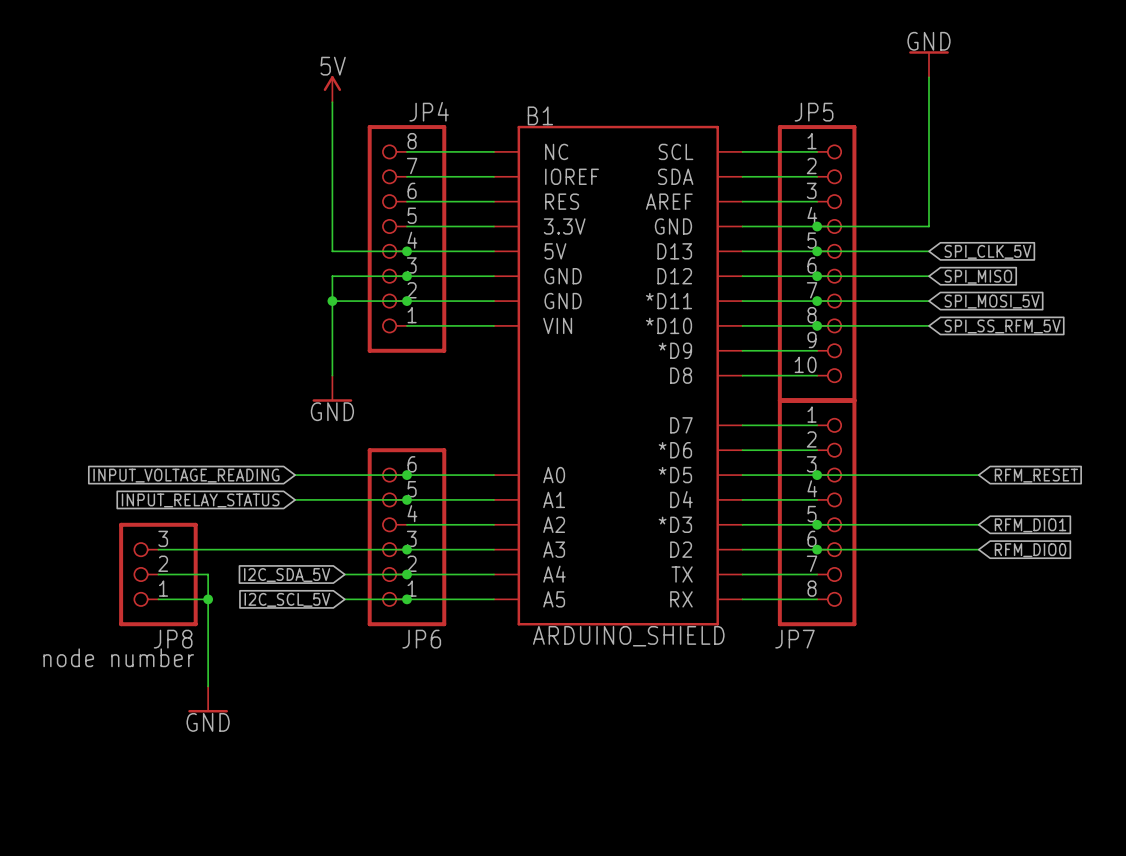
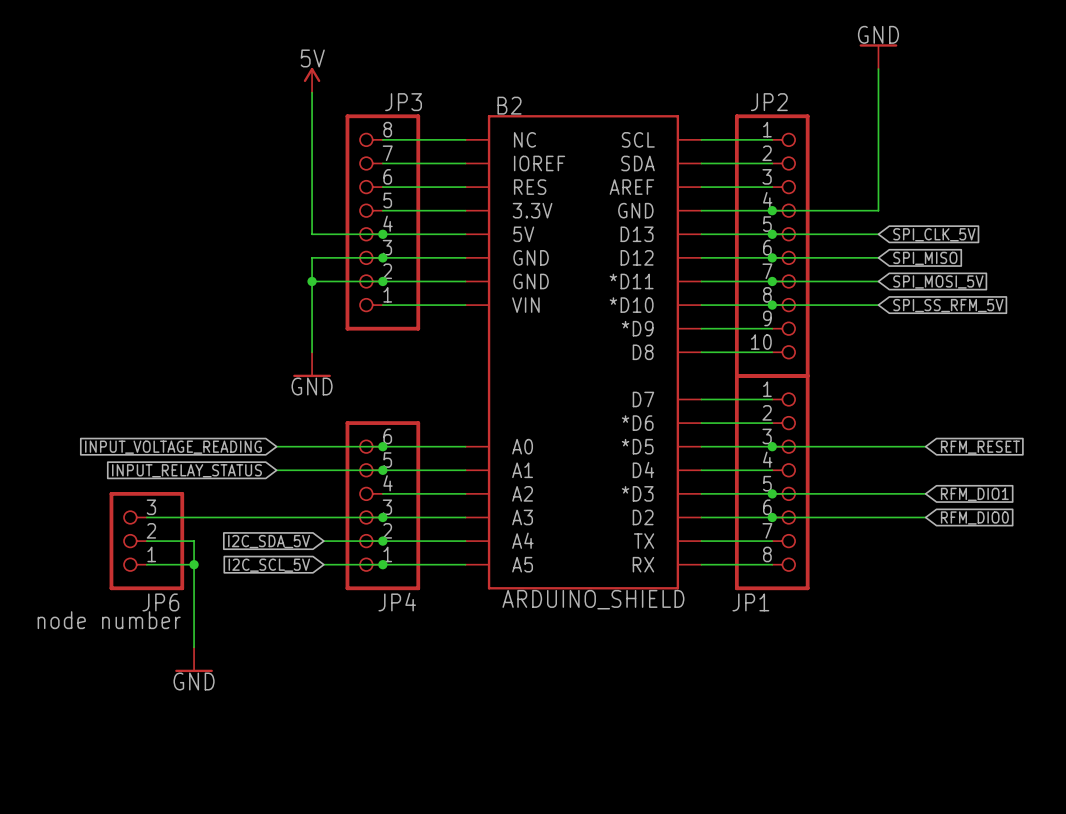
JP4 name: JP4 (429, 111) -> JP3 (403, 102)
JP5 name: JP5 (814, 112) -> JP2 (769, 102)
B1 name: B1 (540, 115) -> B2 (509, 105)
JP8 name: JP8 (173, 639) -> JP6 (160, 602)
JP6 name: JP6 (421, 639) -> JP4 (397, 602)
JP7 name: JP7 (794, 639) -> JP1 (750, 602)

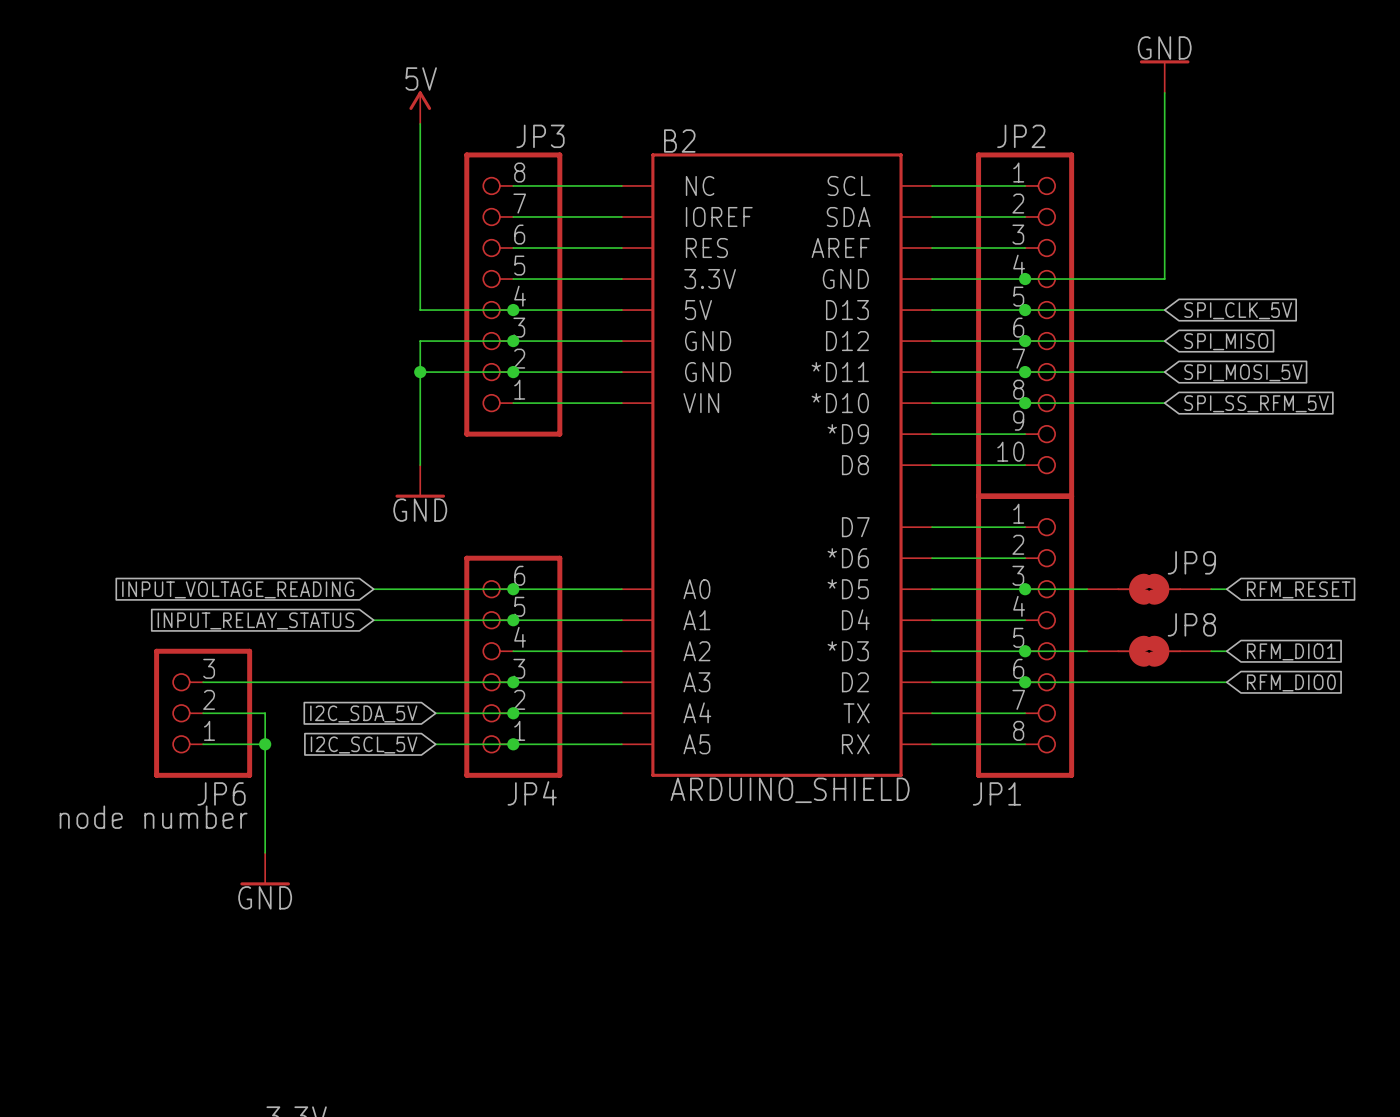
JP9: none -> (1149, 589)
JP8: none -> (1149, 651)

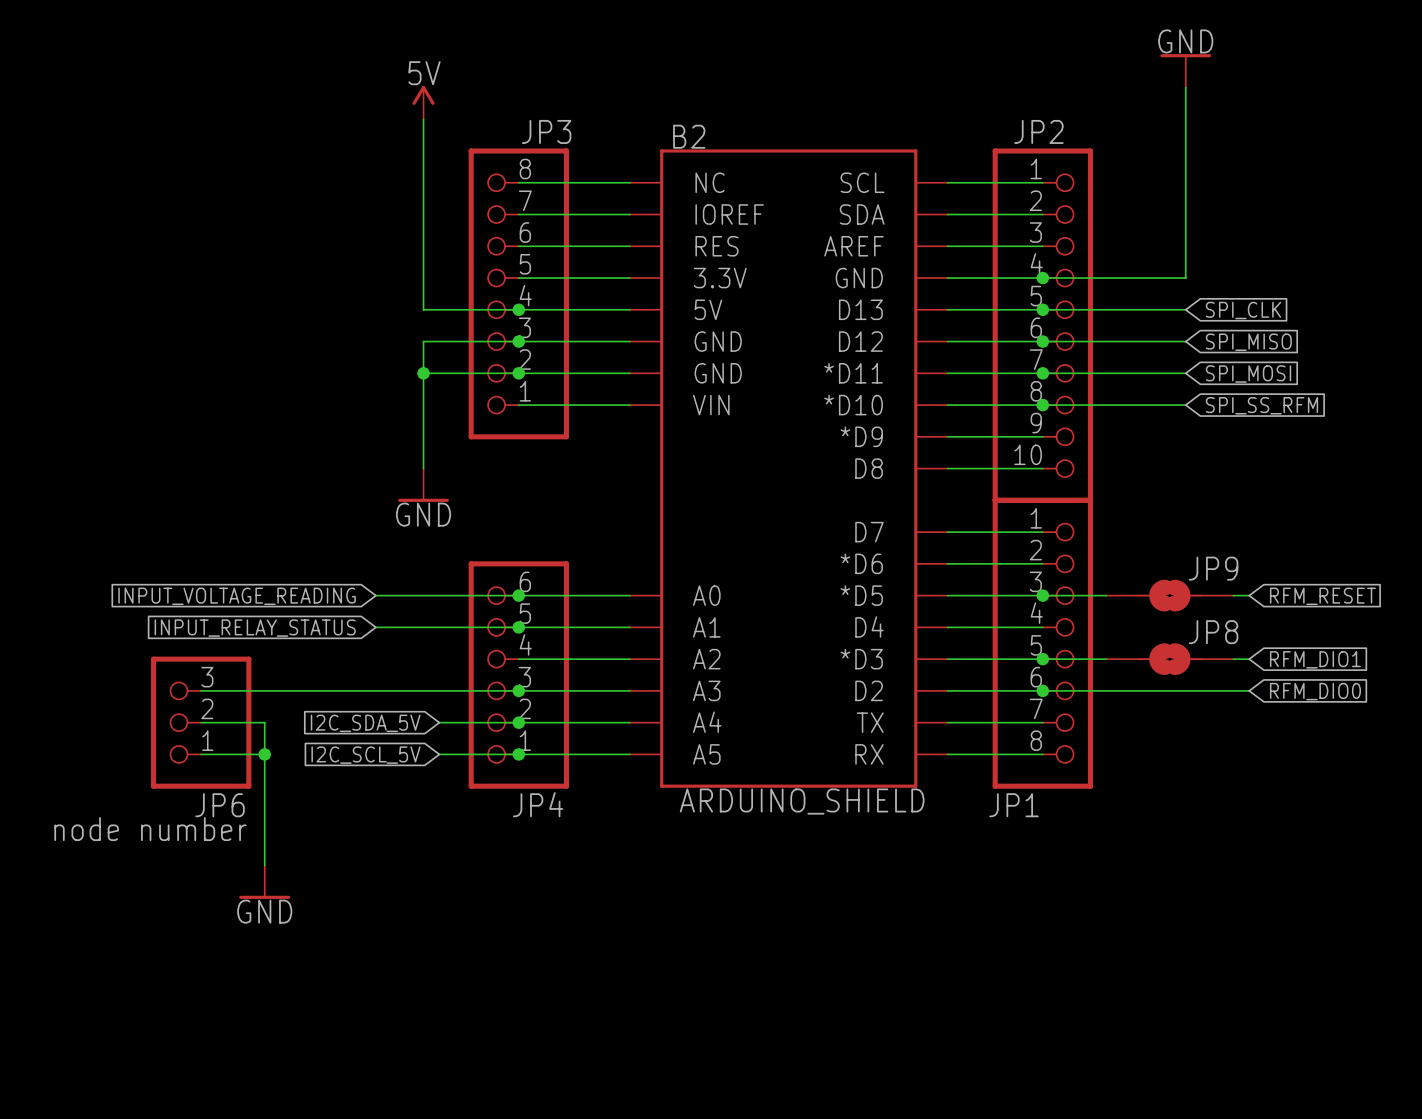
global label: SPI_CLK_5V (1238, 310) -> SPI_CLK (1243, 310)
global label: SPI_MOSI_5V (1243, 372) -> SPI_MOSI (1248, 374)
global label: SPI_SS_RFM_5V (1256, 403) -> SPI_SS_RFM (1261, 405)

